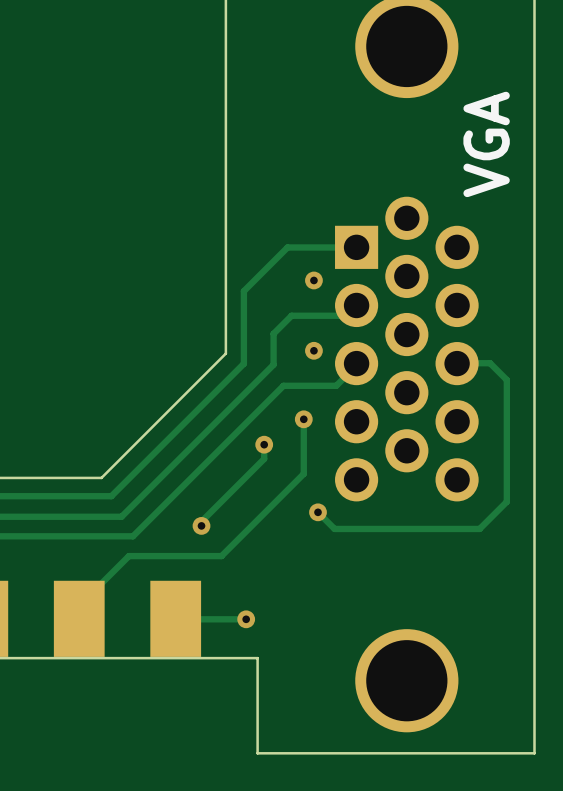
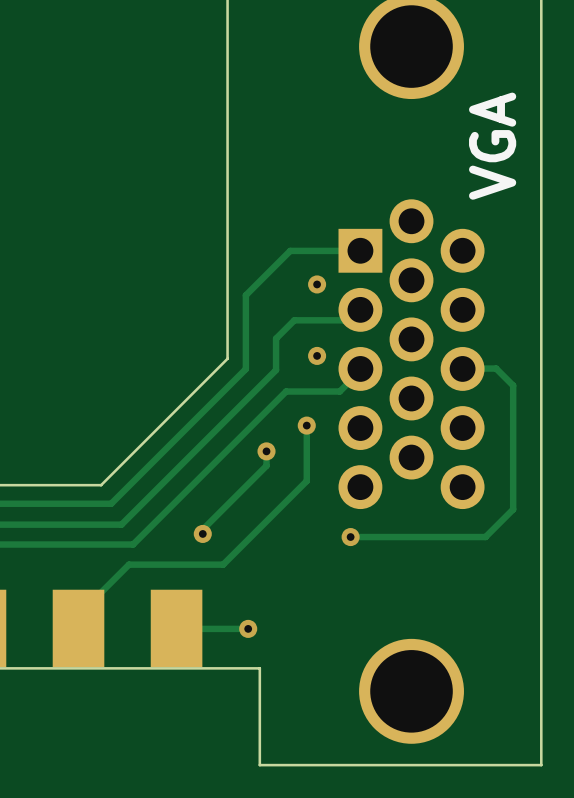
track: (318, 512) (334, 528) (346, 528) -> none
via position: (318, 512) -> (350, 537)

